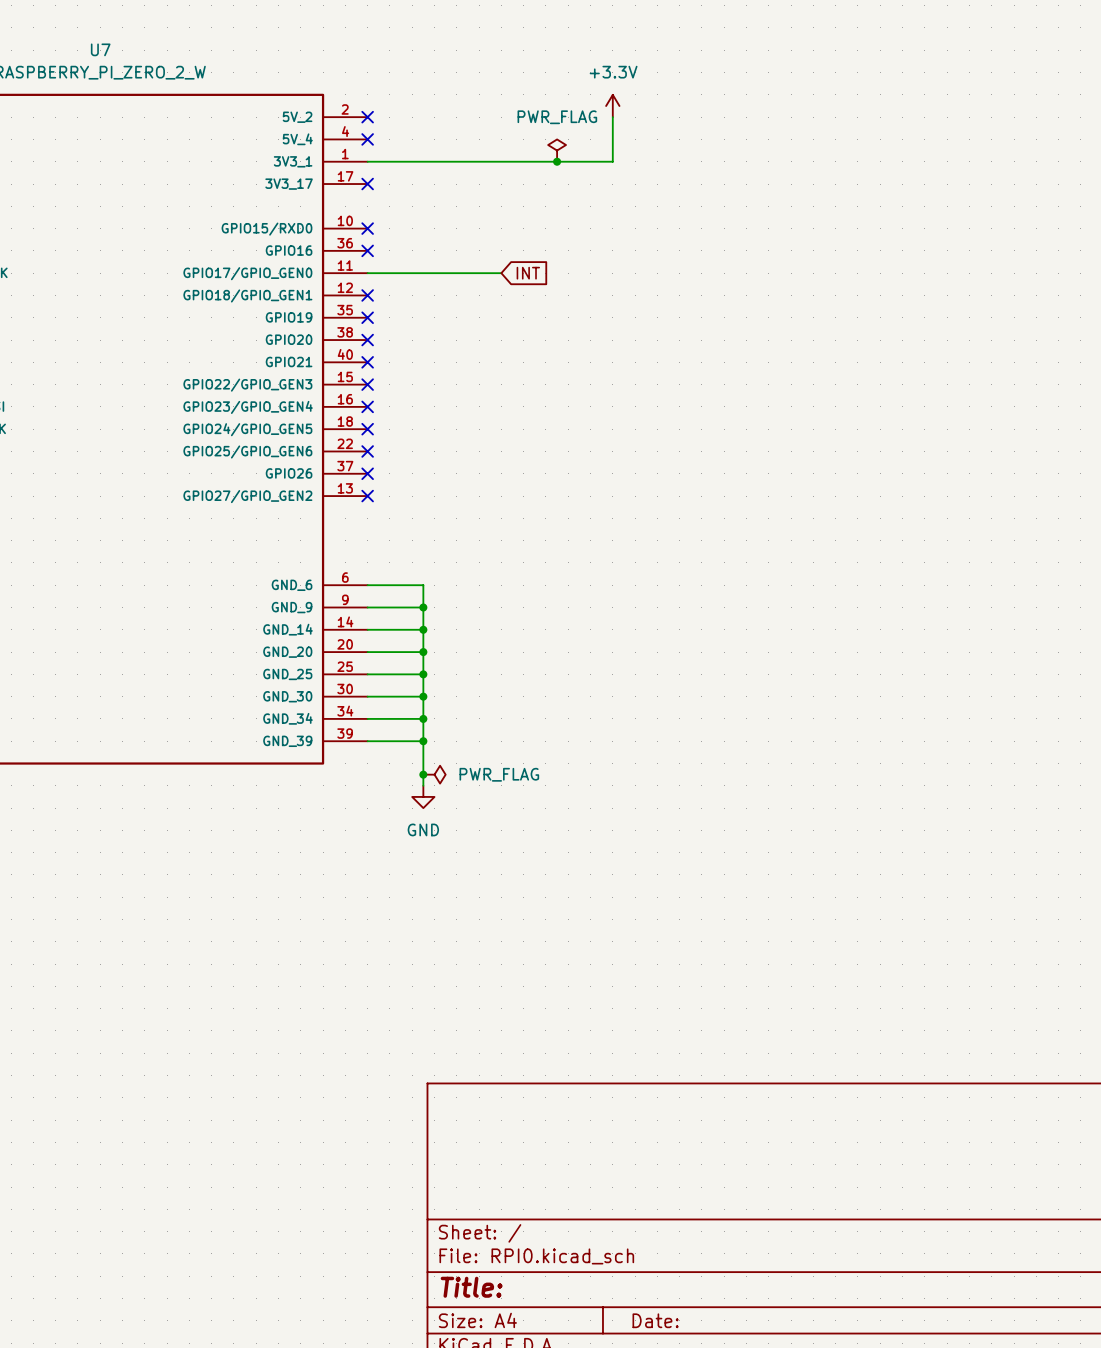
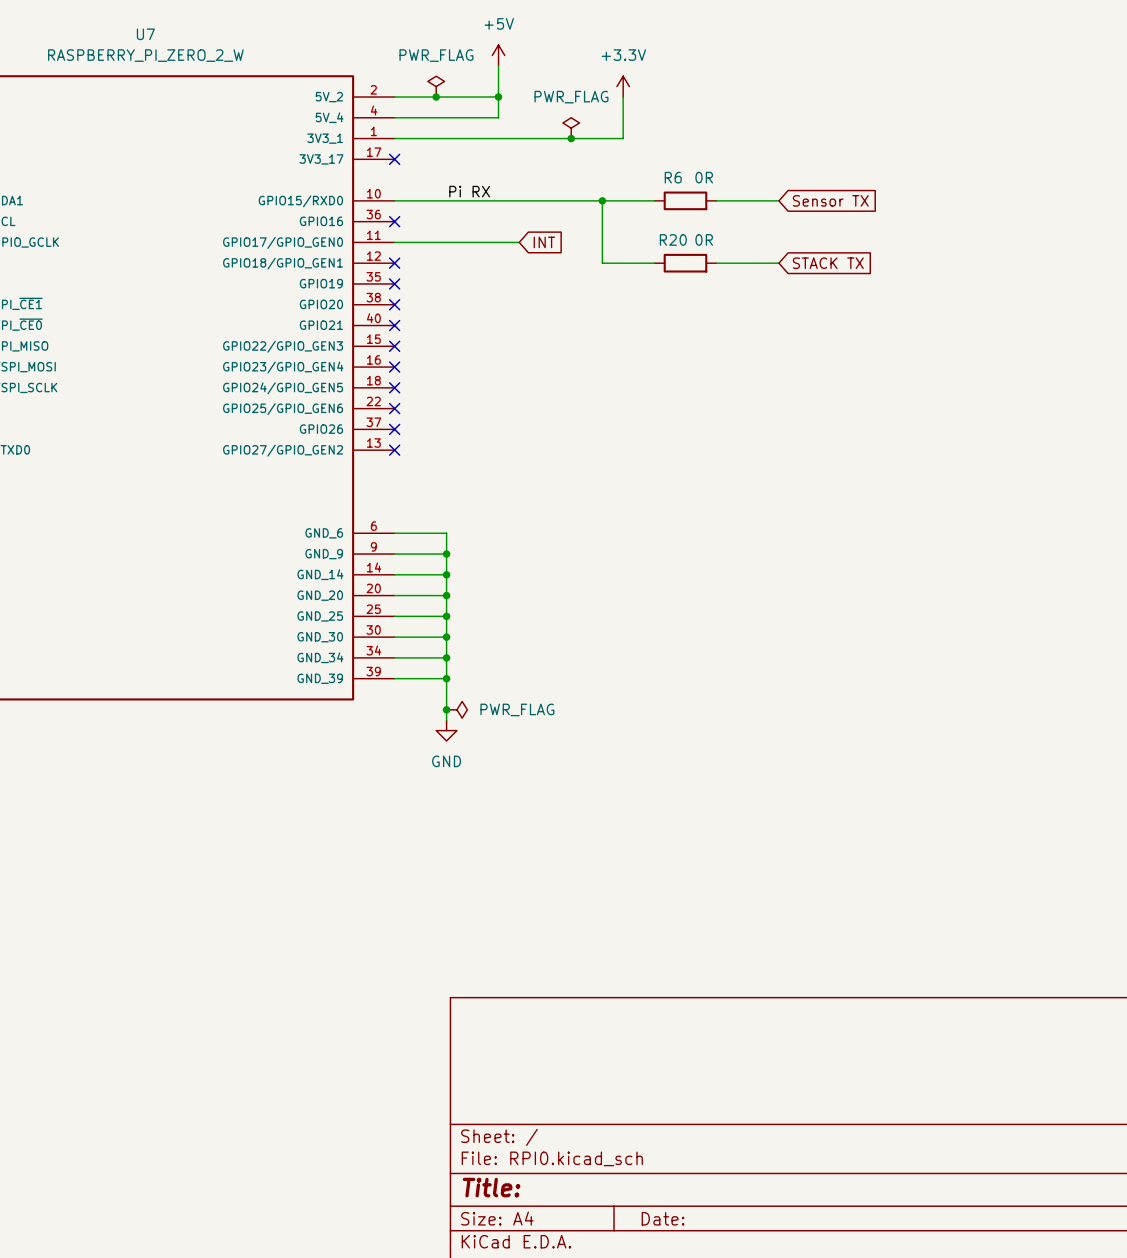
power symbol: none -> +5V (498, 55)
wire: none -> (498, 65) (498, 117) (394, 117)
power symbol: none -> PWR_FLAG (436, 86)
wire: none -> (394, 97) (498, 97)
no-connect mark: (367, 117) -> none
junction: none -> (436, 97)
junction: none -> (498, 97)
no-connect mark: (367, 139) -> none
label: none -> Pi RX (469, 191)
wire: none -> (394, 200) (654, 200)
no-connect mark: (367, 228) -> none
wire: none -> (602, 200) (602, 263) (654, 263)
junction: none -> (602, 200)
R6: none -> 0R (685, 200)
wire: none -> (716, 200) (778, 200)
global label: none -> Sensor TX (830, 200)
R20: none -> 0R (685, 263)
wire: none -> (716, 263) (778, 263)
global label: none -> STACK TX (828, 263)

